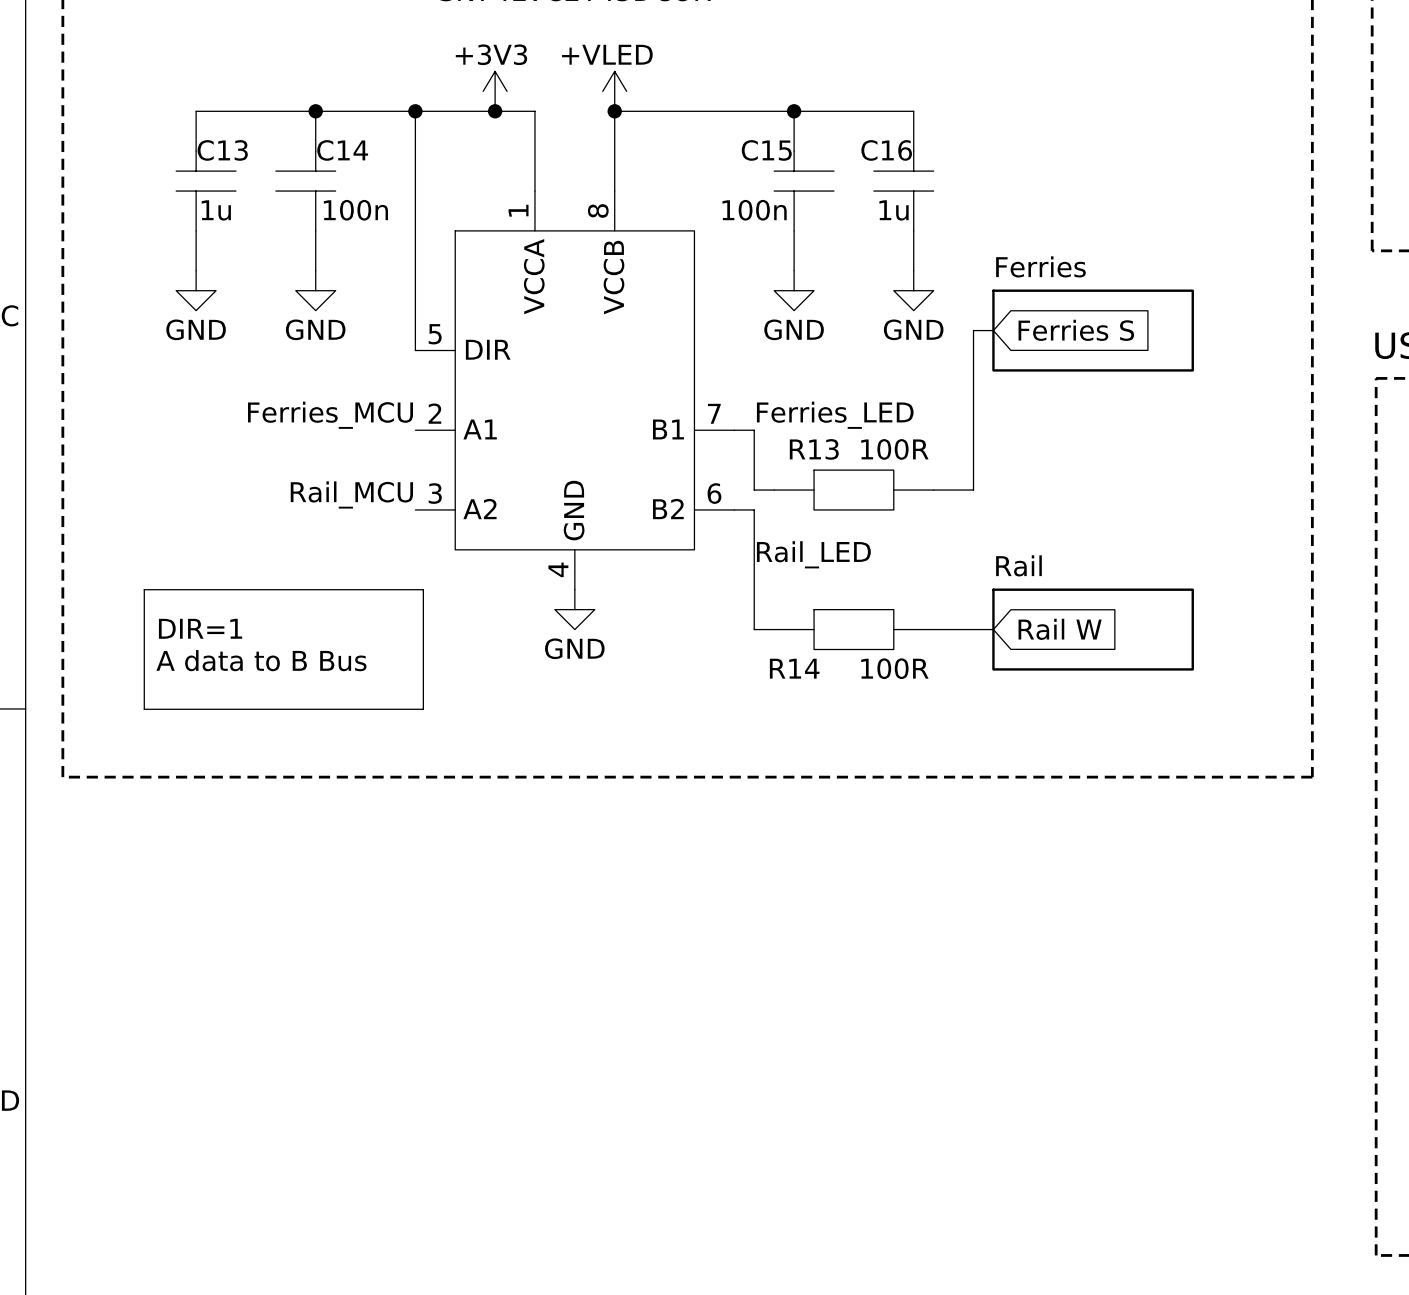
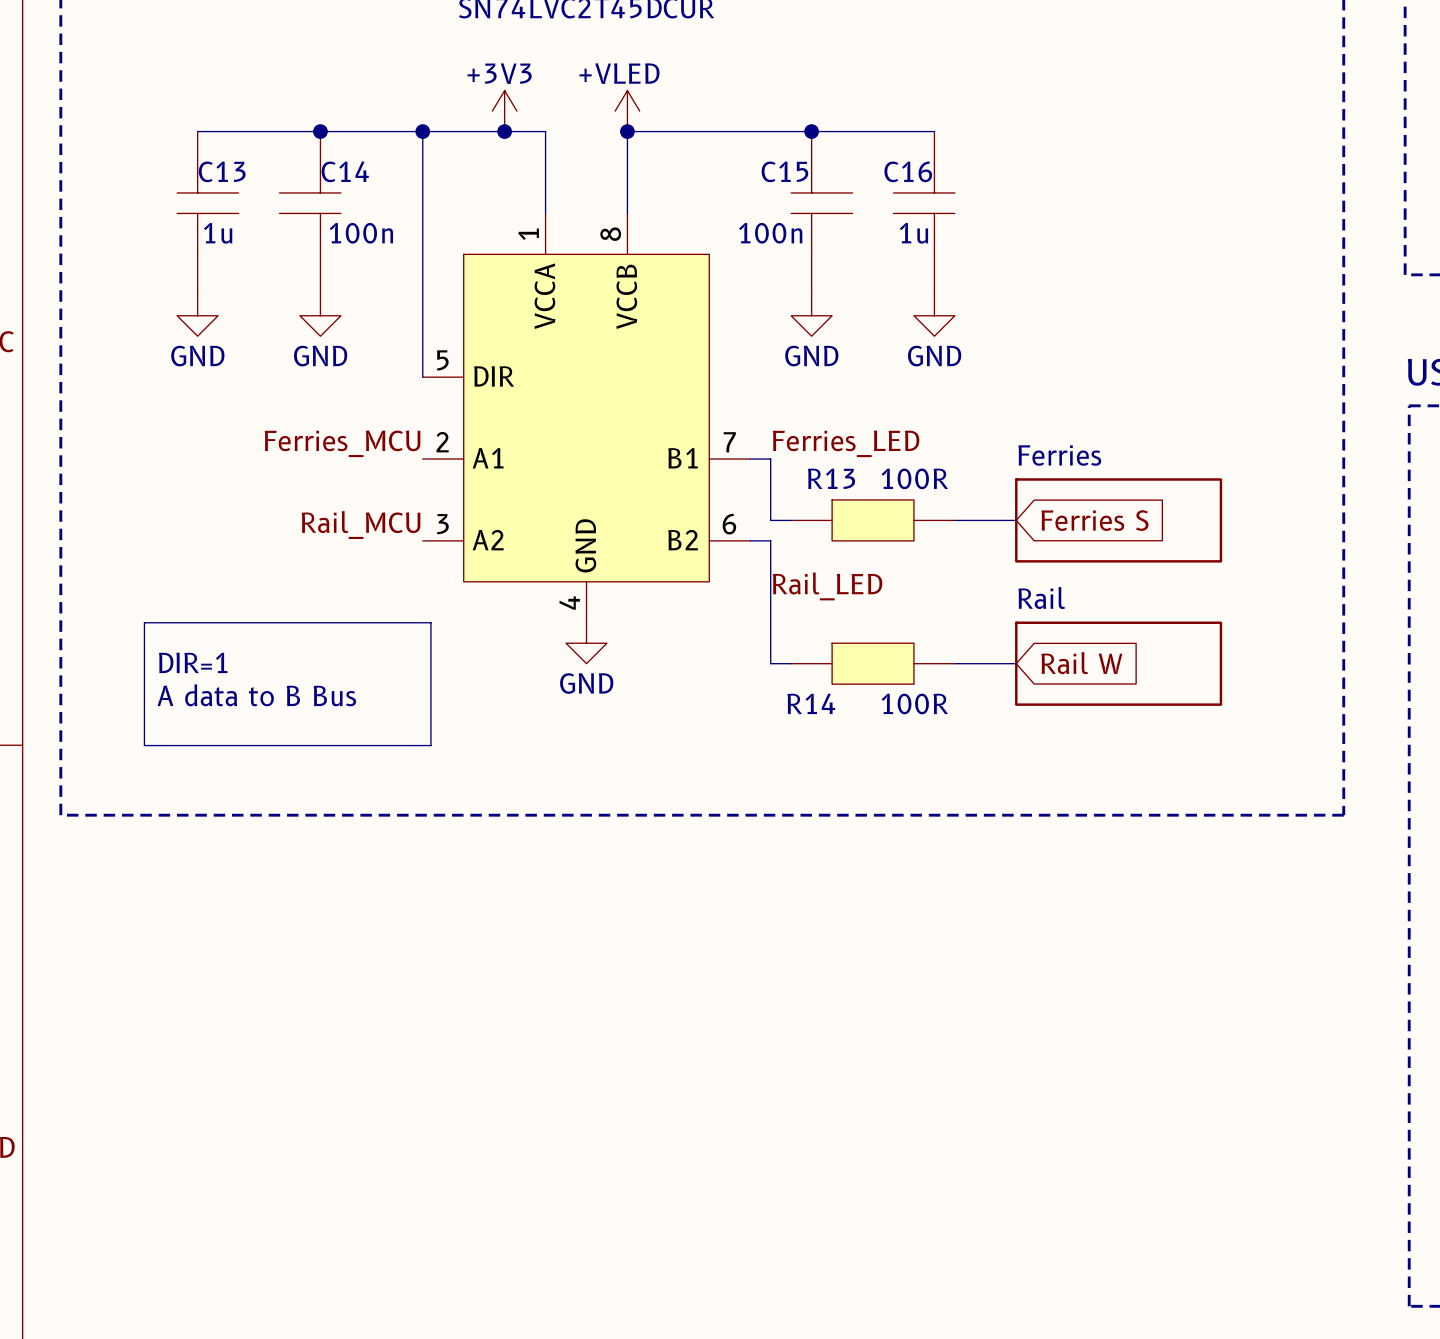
wire: (993, 330) (973, 330) (973, 490) -> (1016, 520) (995, 520)
global label position: Ferries S (1076, 330) -> Ferries S (1094, 520)
sheet Ferries position: (1093, 330) -> (1118, 520)

